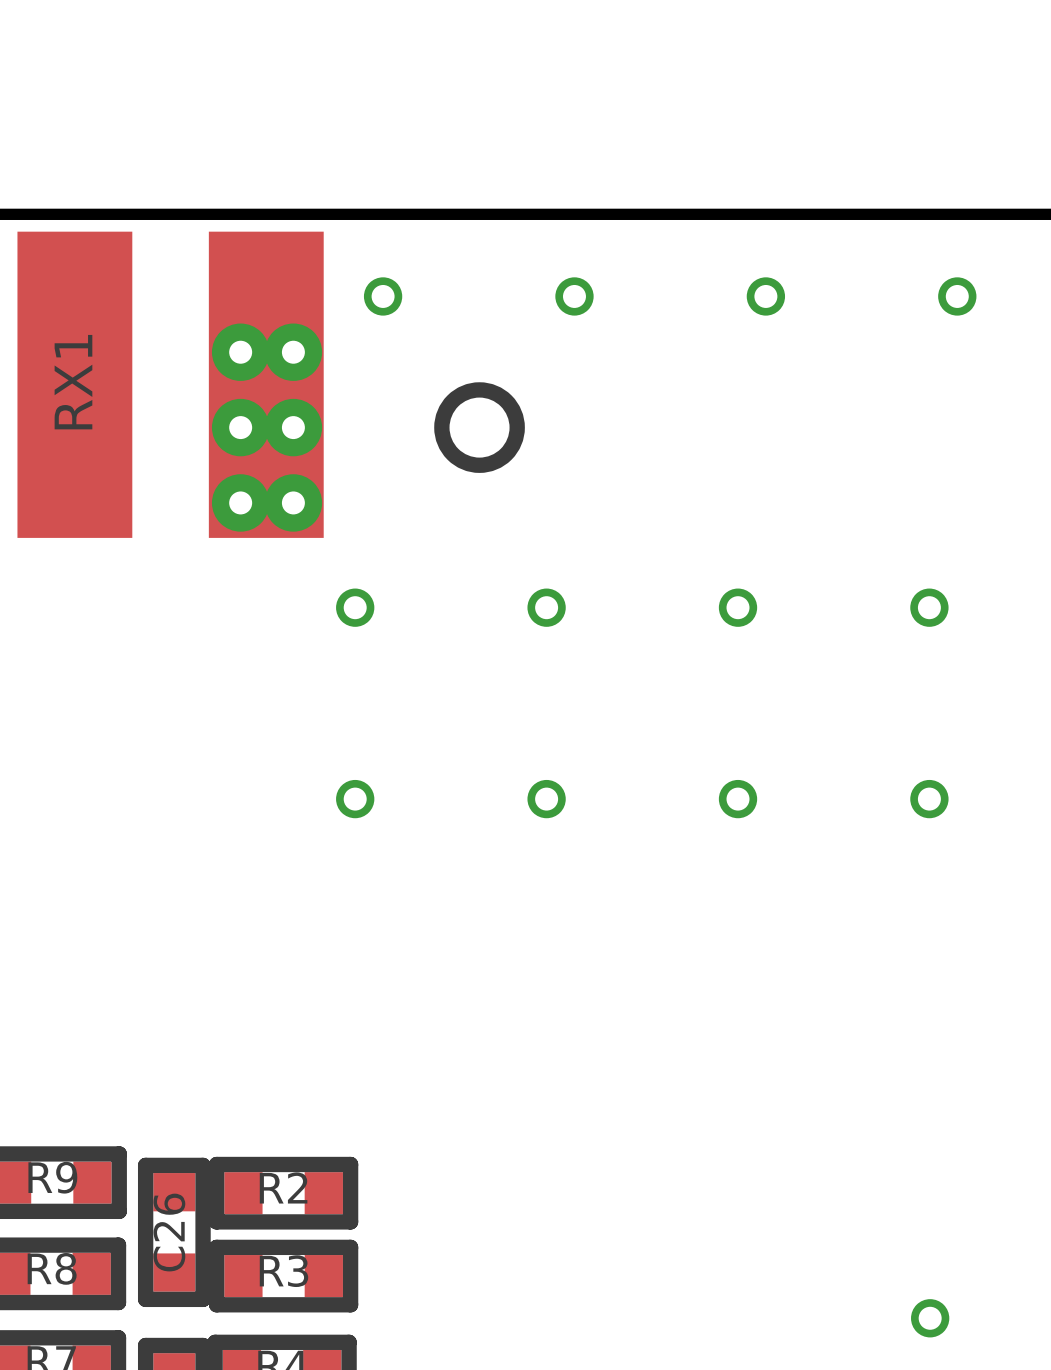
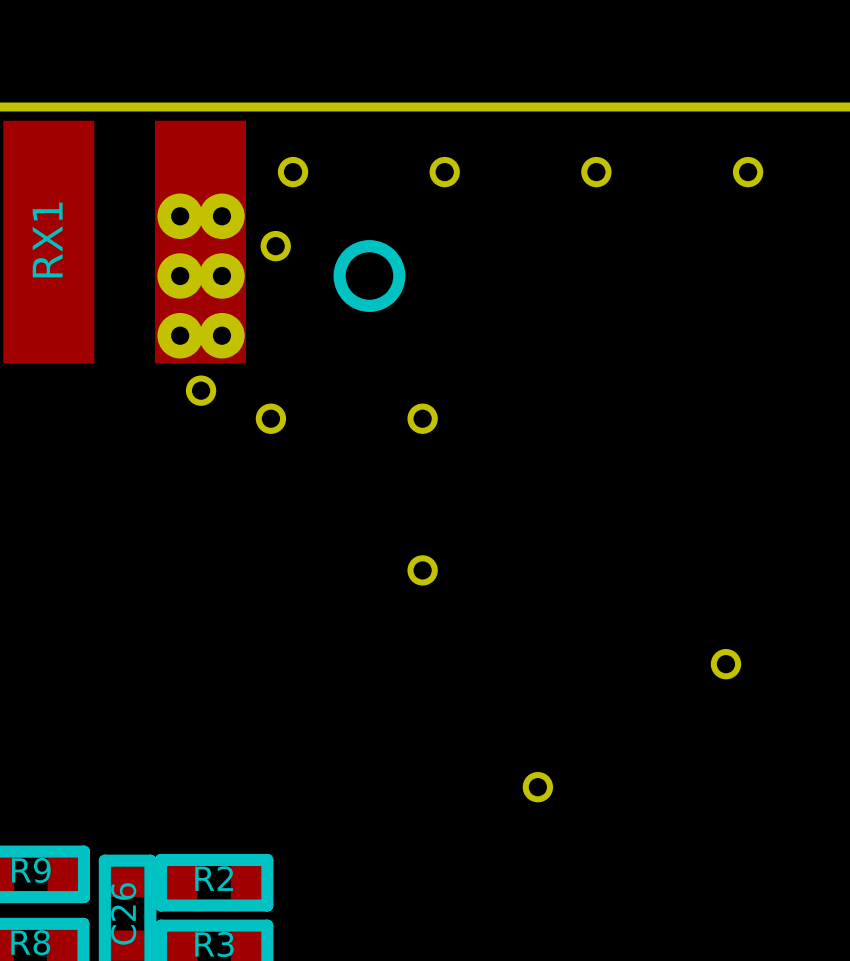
part: none -> (275, 246)
part: none -> (201, 390)
part: (738, 607) -> none
part: (929, 607) -> none
part: (355, 799) -> none
part: (738, 799) -> none
part: (929, 799) -> none
part: none -> (725, 664)
part: none -> (537, 787)

